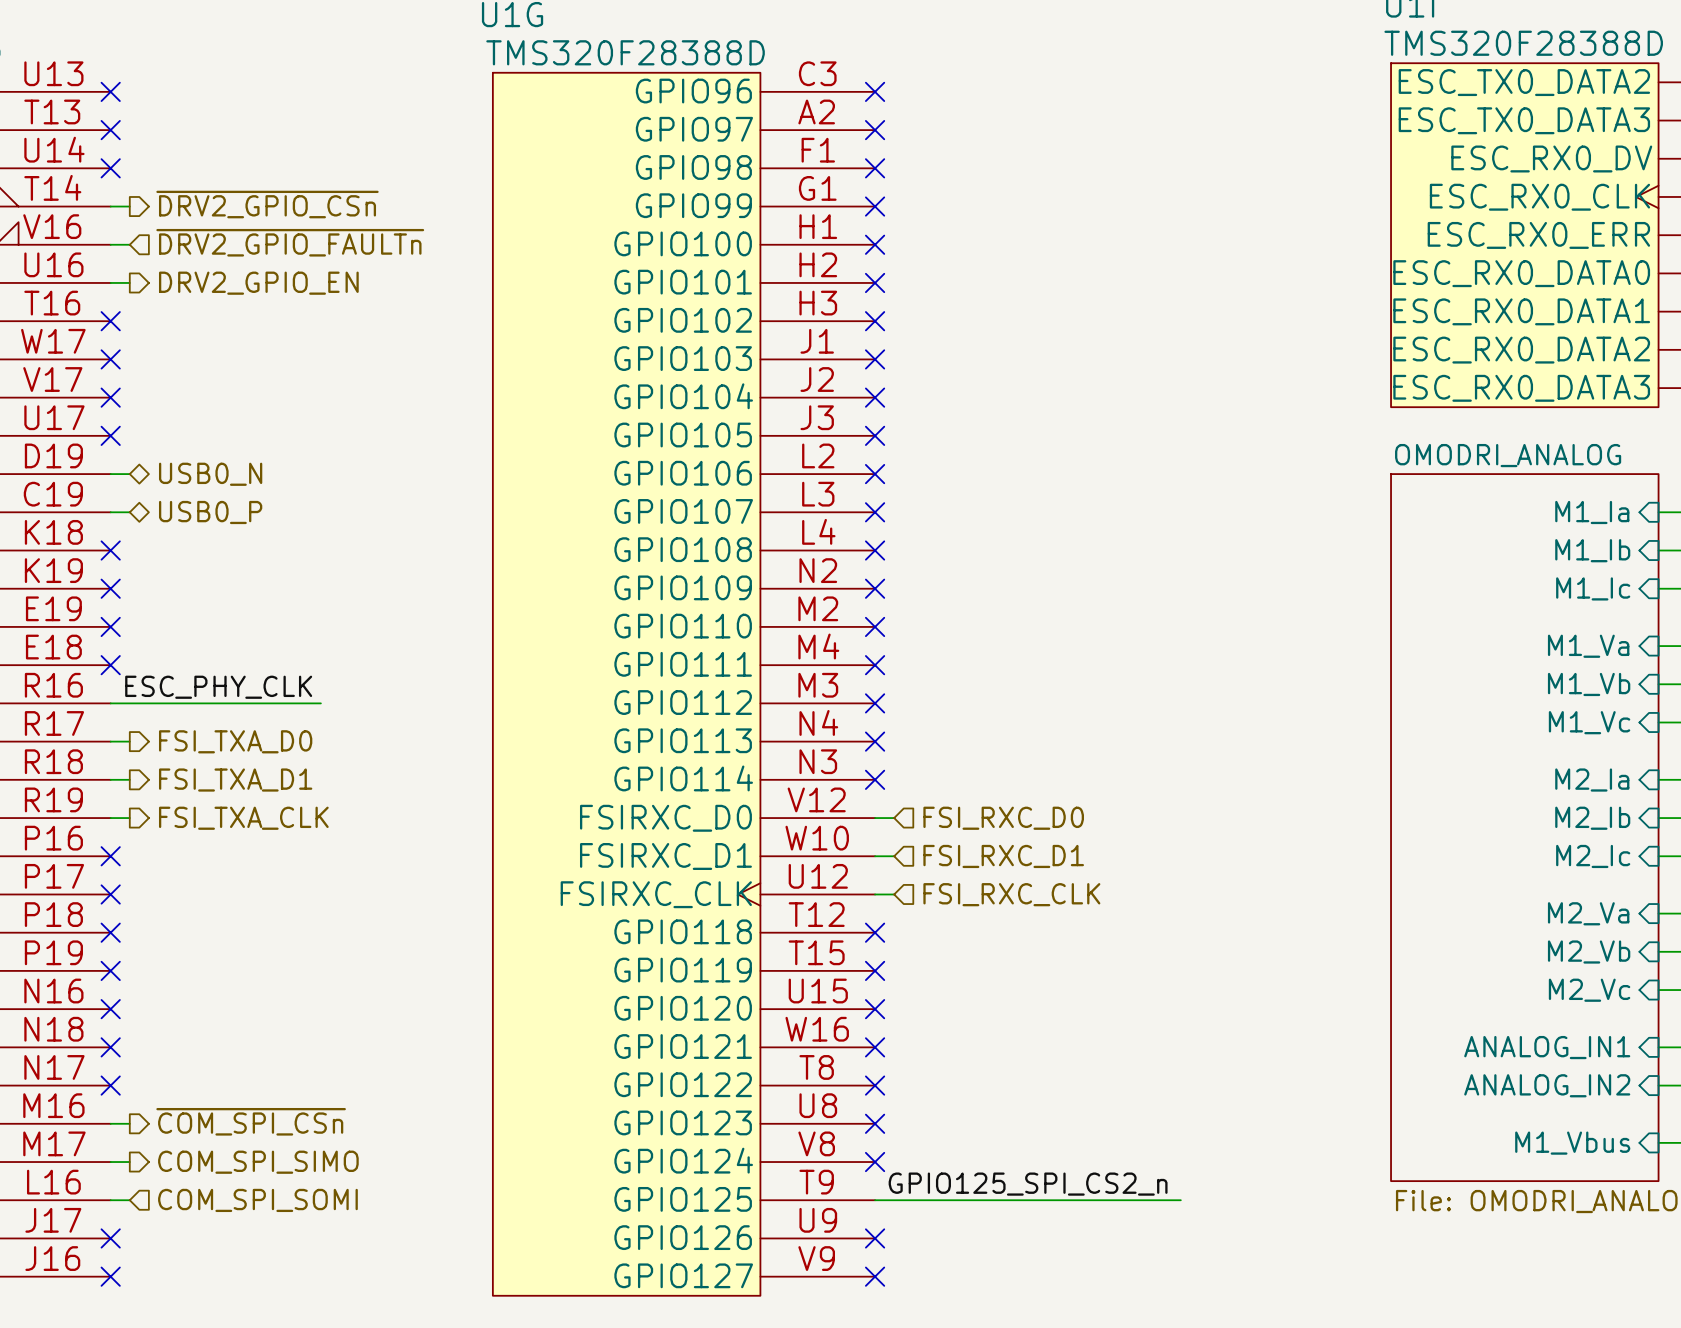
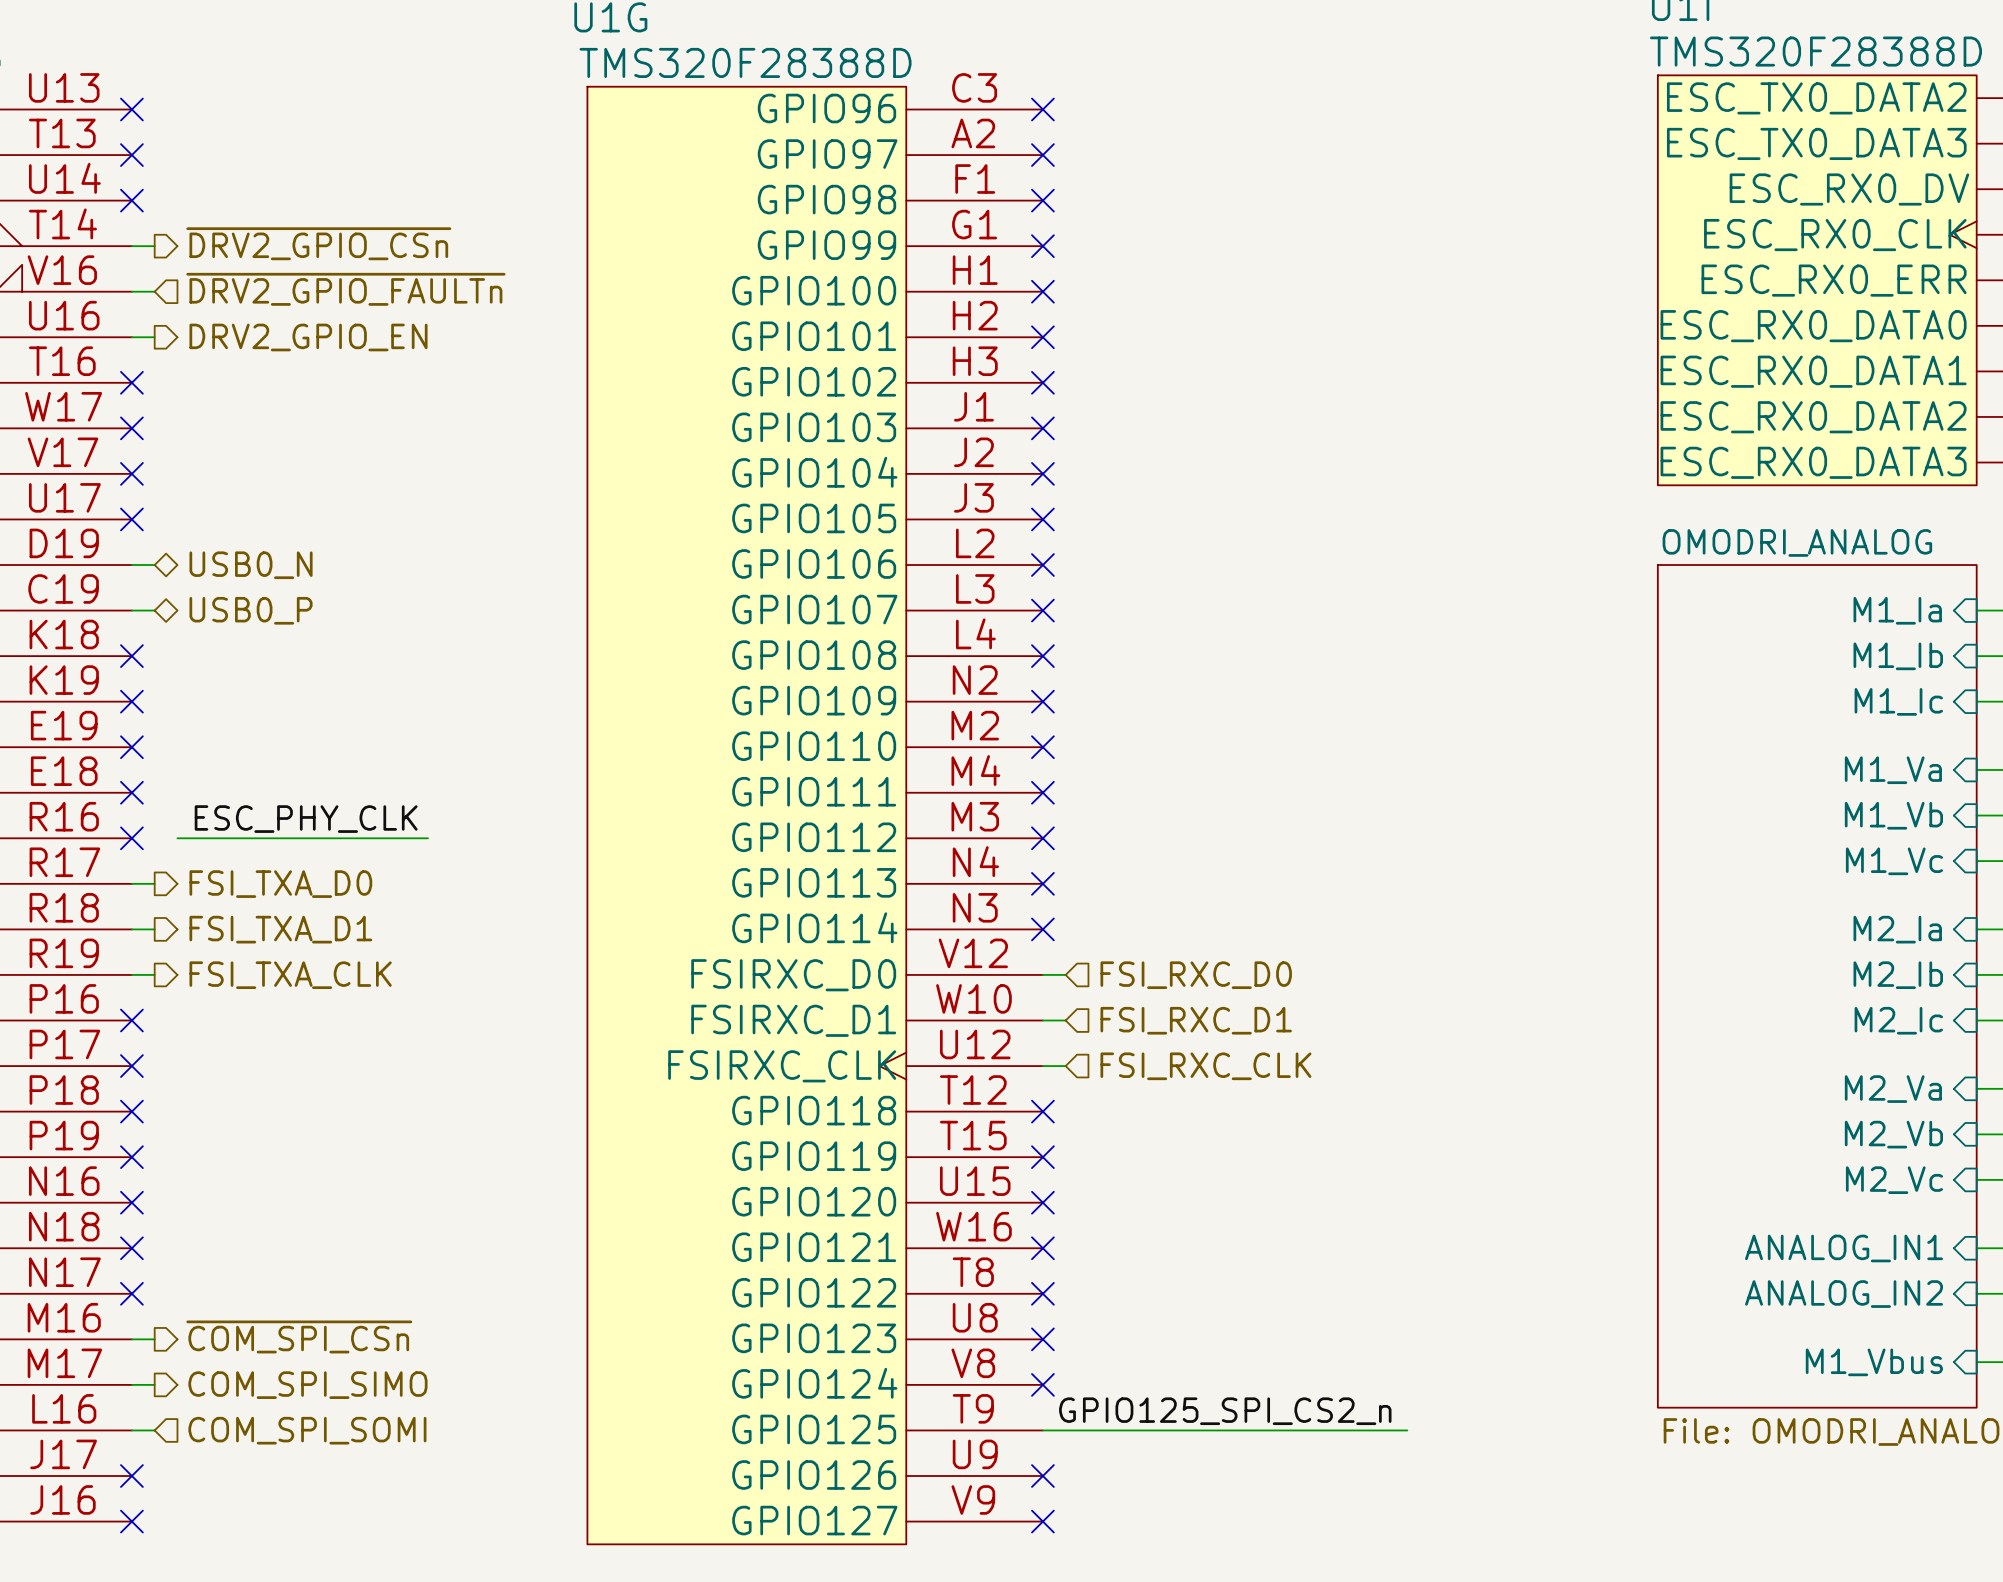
label position: ESC_PHY_CLK (218, 687) -> ESC_PHY_CLK (306, 819)
wire: (110, 703) (148, 703) -> (382, 838) (427, 838)
no-connect mark: none -> (131, 838)

